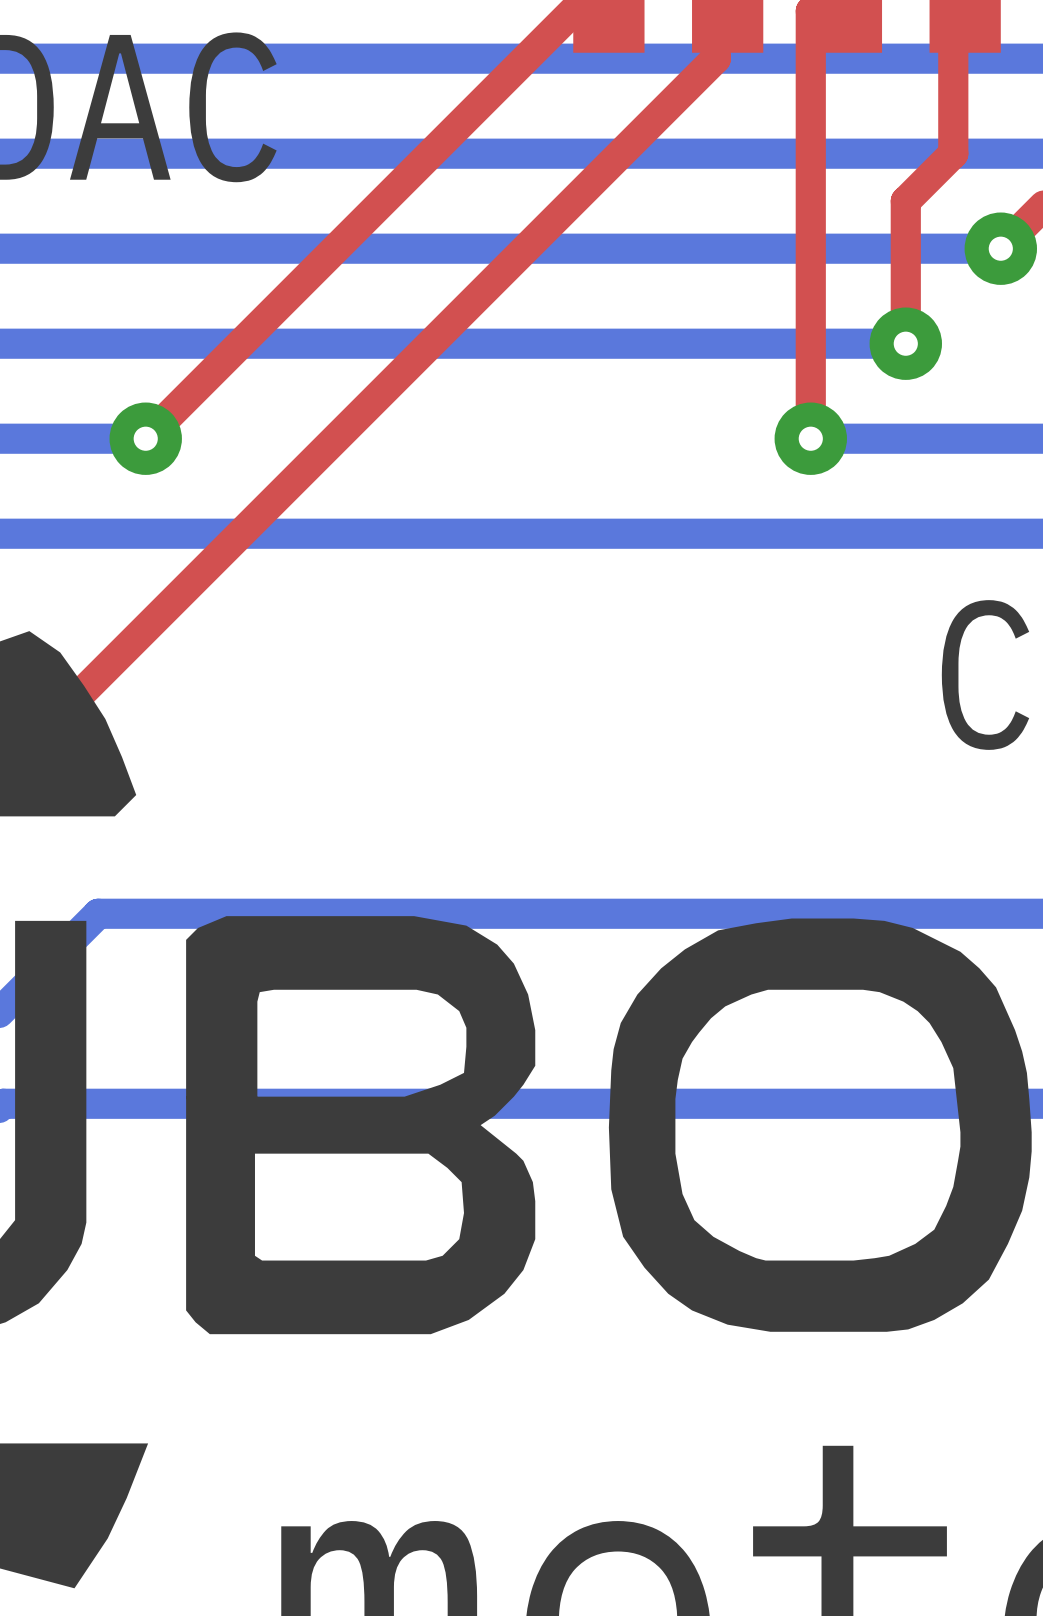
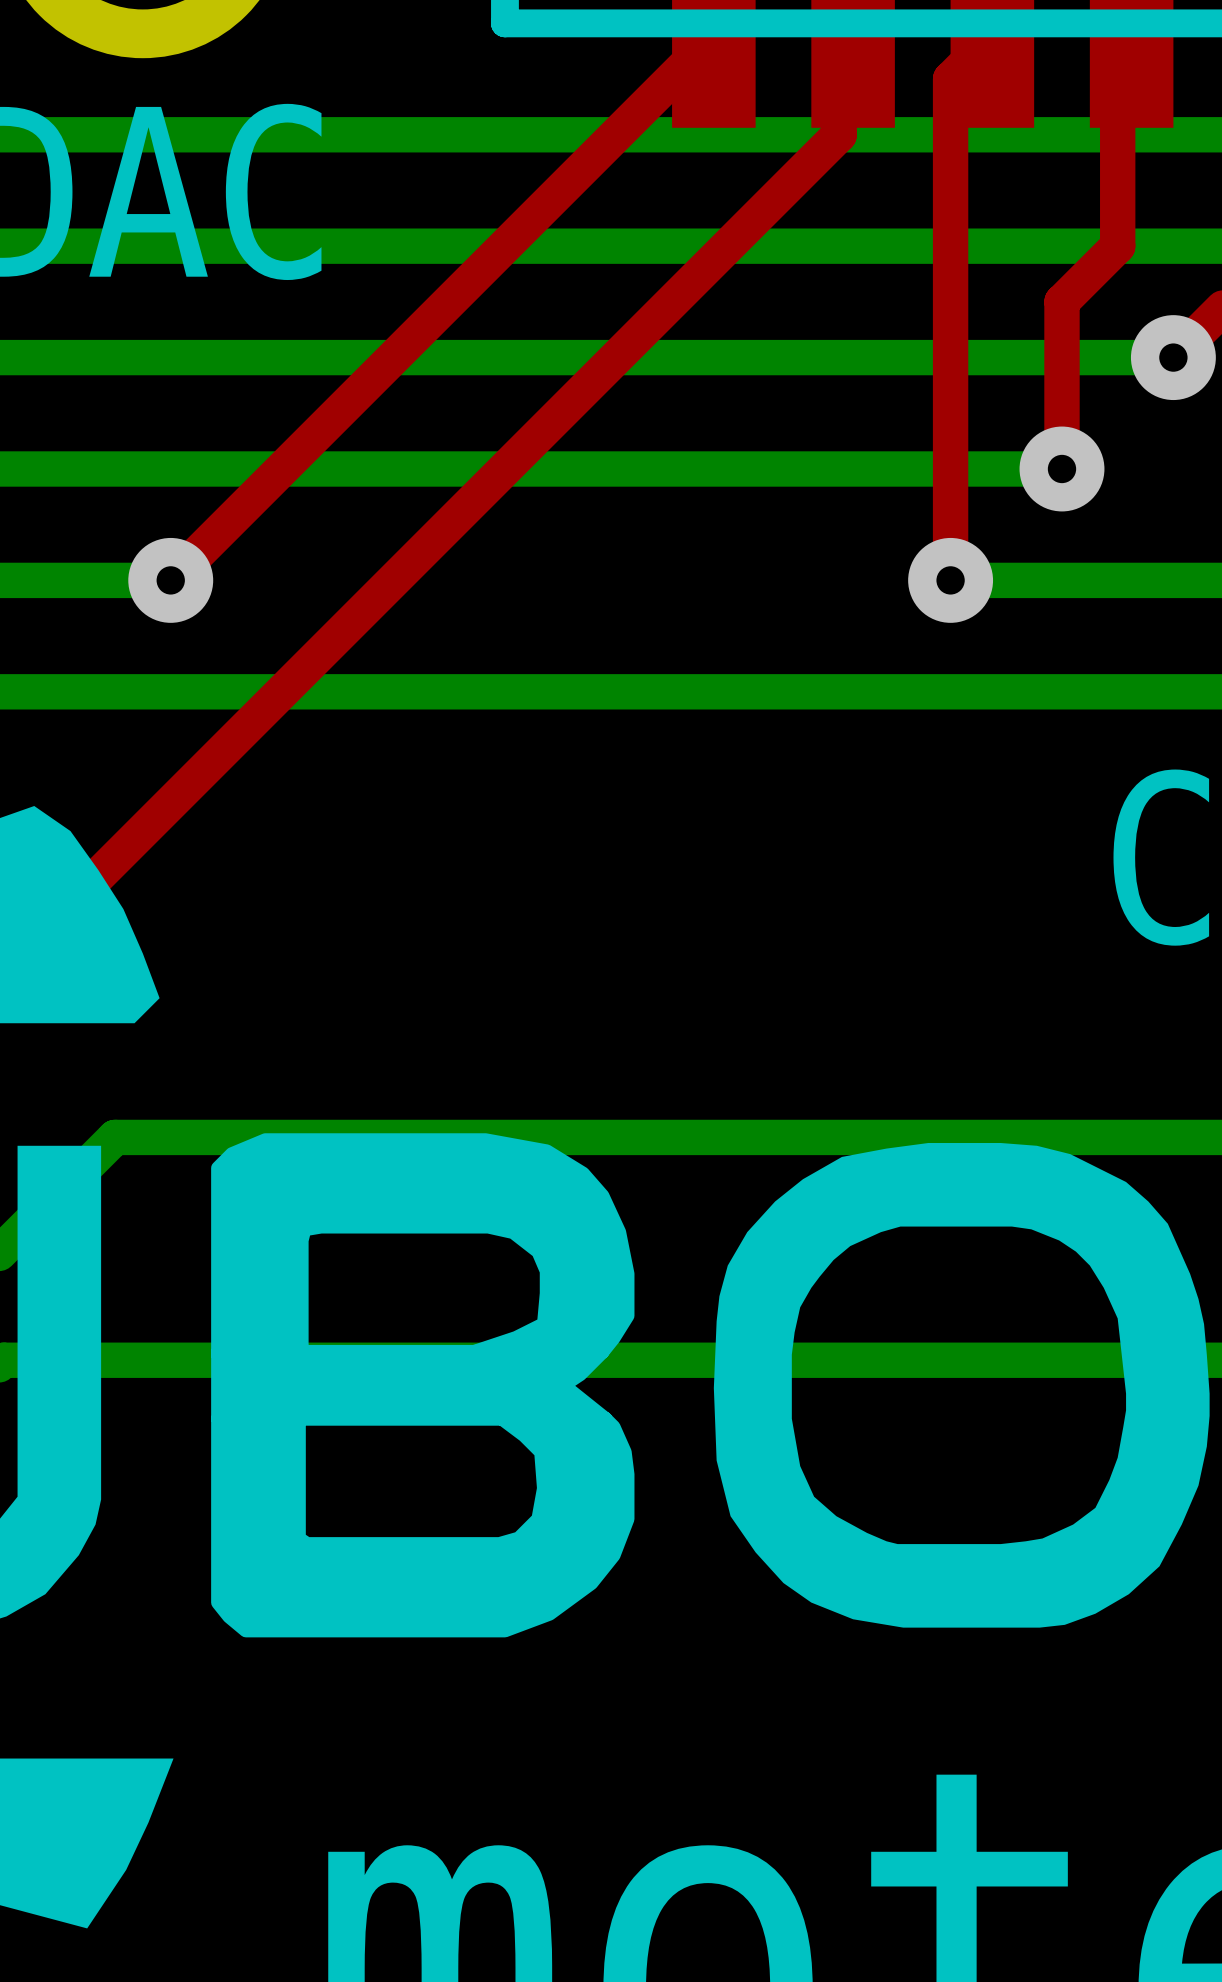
drawing shape: [186, 916, 536, 1100] -> [211, 1133, 635, 1362]
drawing shape: [186, 1096, 517, 1154] -> [211, 1344, 613, 1426]
drawing shape: [186, 1153, 536, 1335] -> [211, 1411, 635, 1638]

